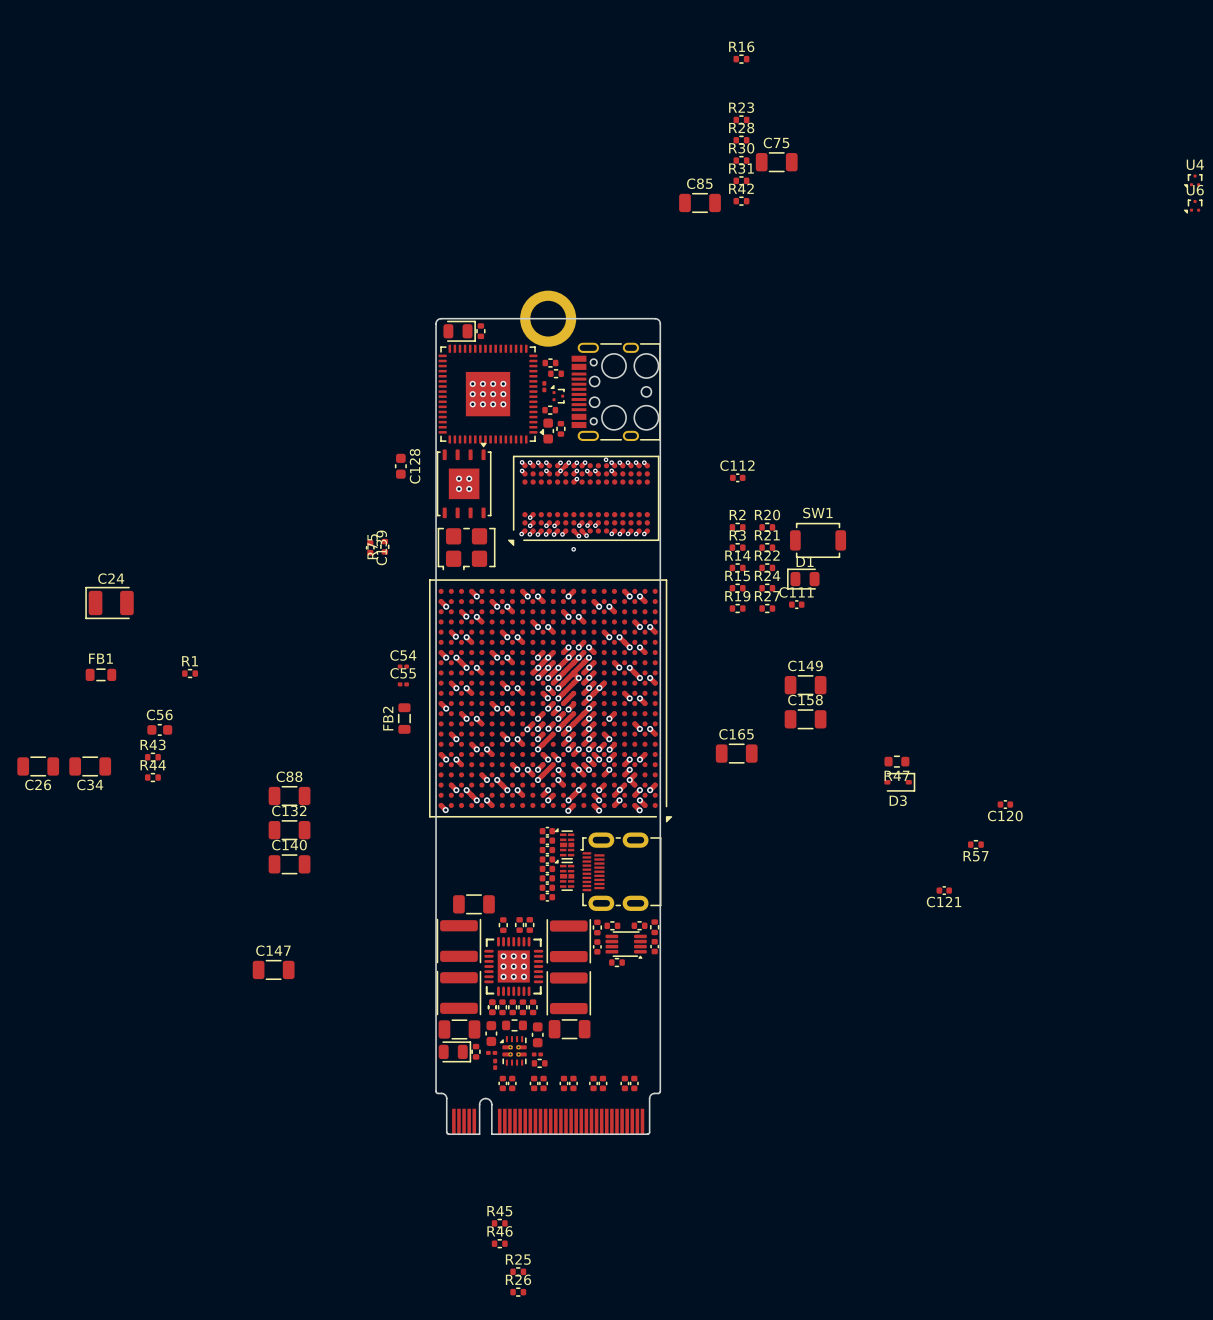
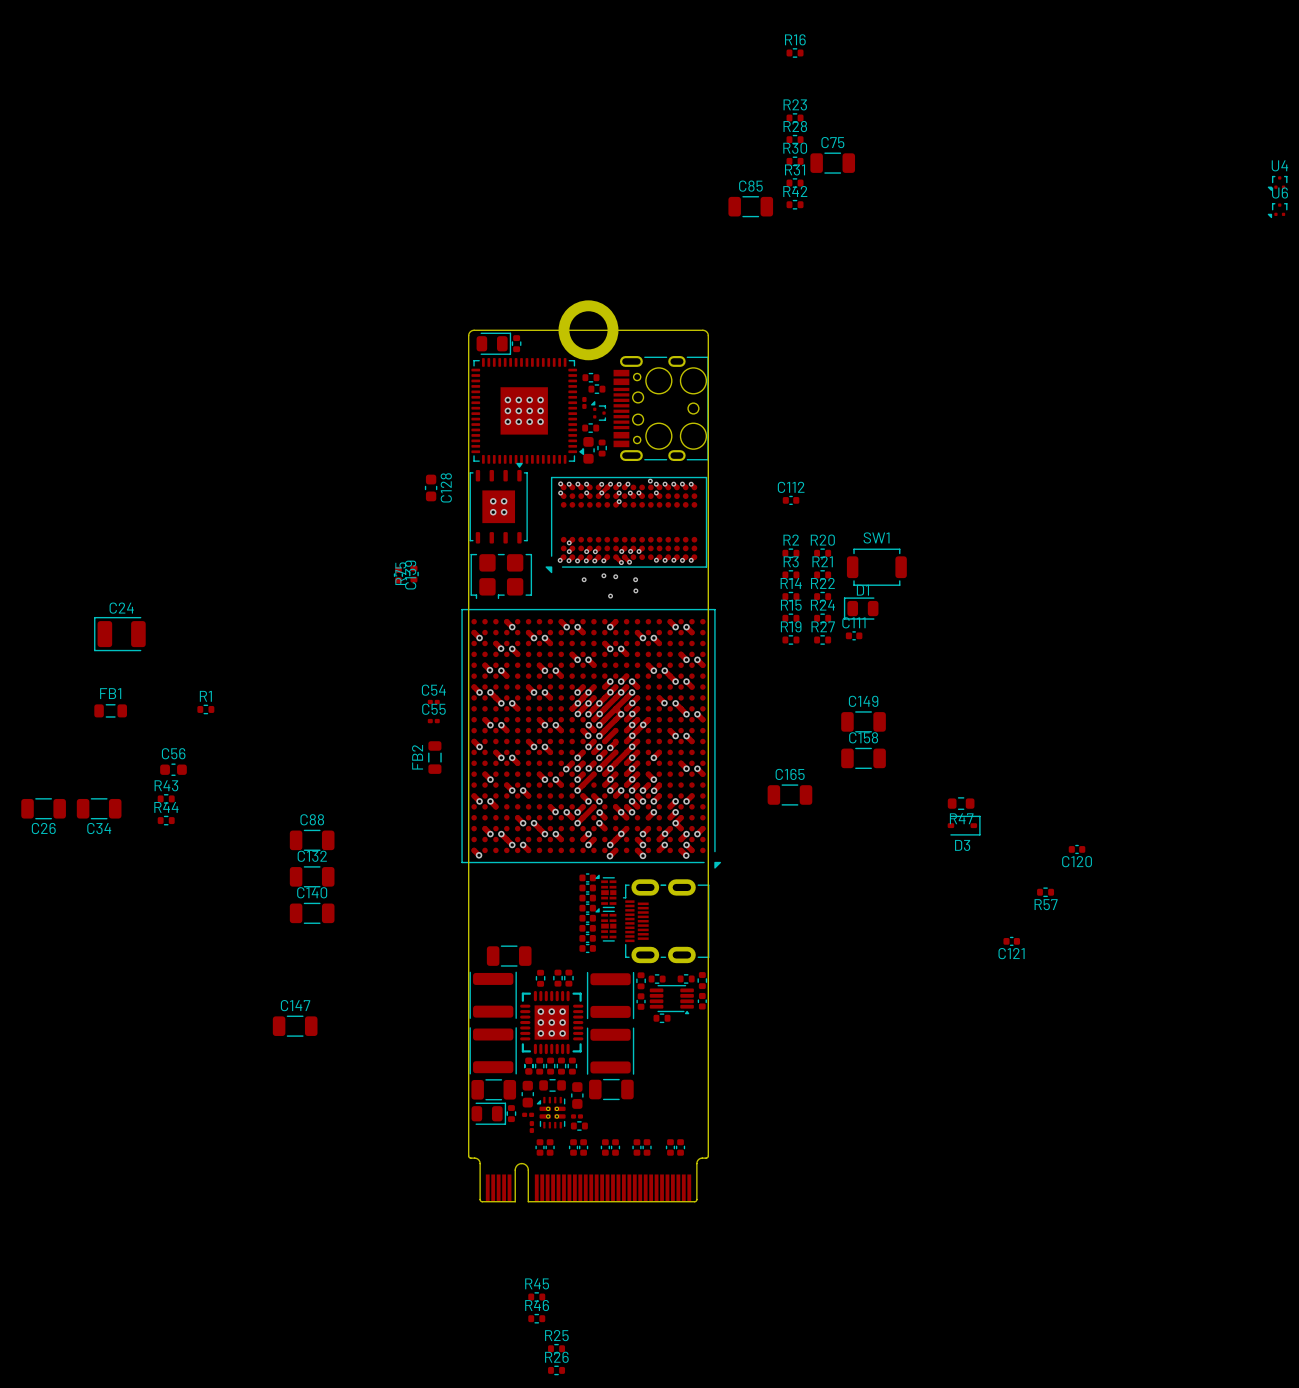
via: none -> (603, 575)
via: none -> (584, 579)
via: none -> (635, 579)
via: none -> (635, 590)
via: none -> (610, 596)

